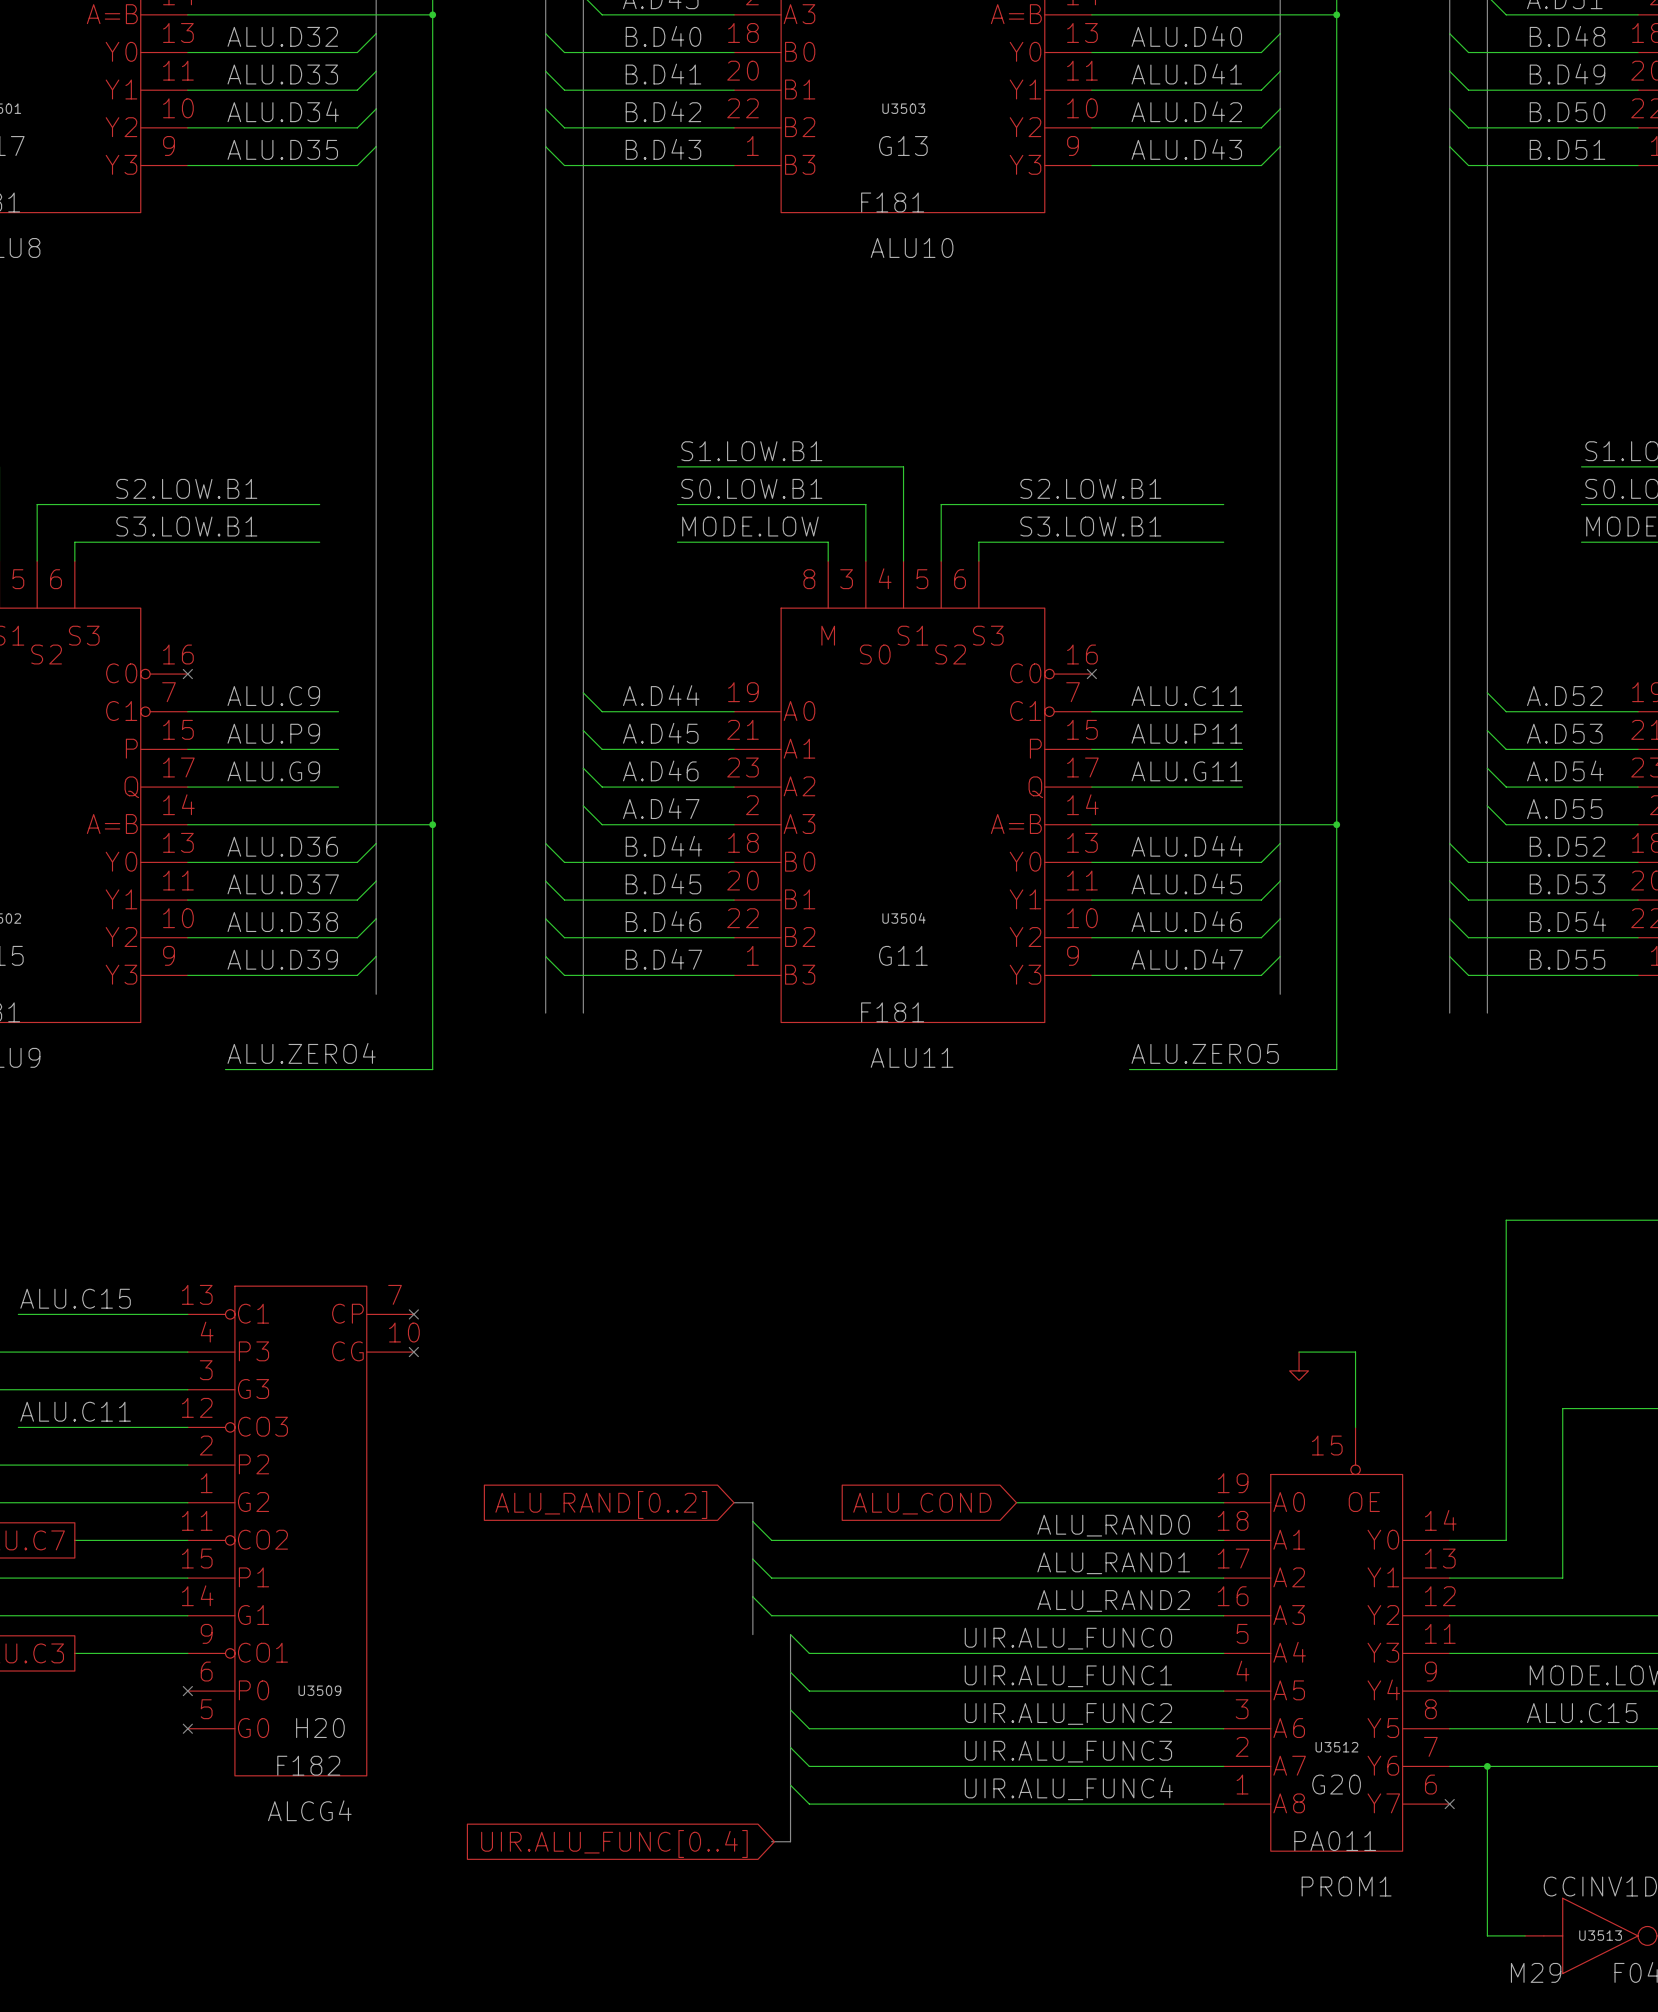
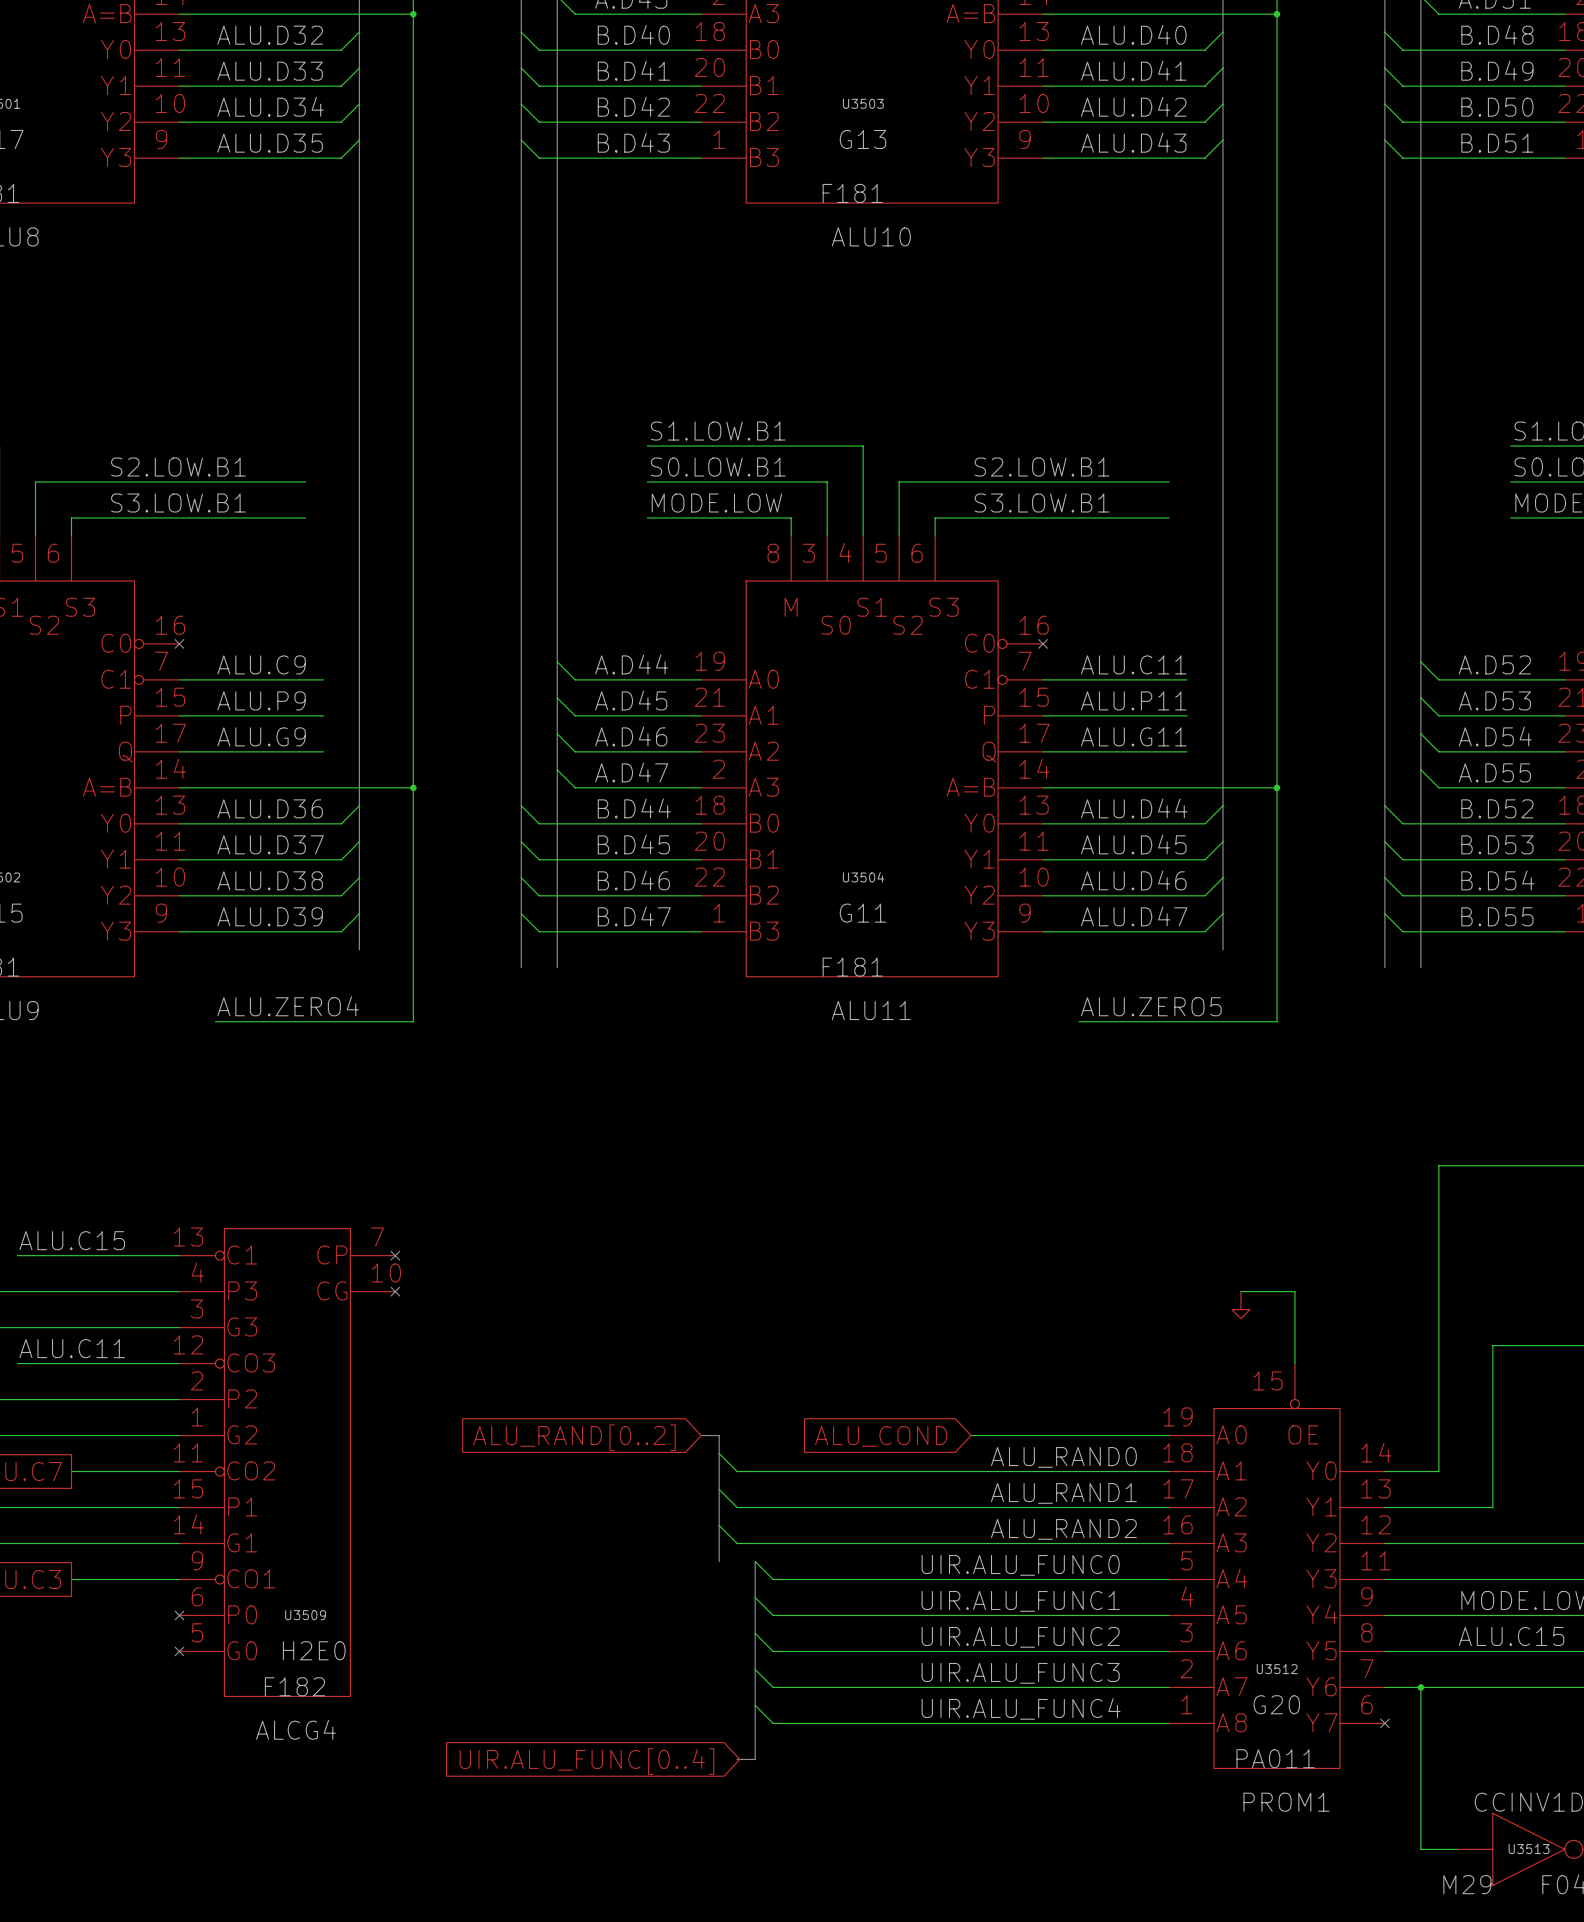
U3509 text: H20 (320, 1728) -> H2E0 (314, 1650)

